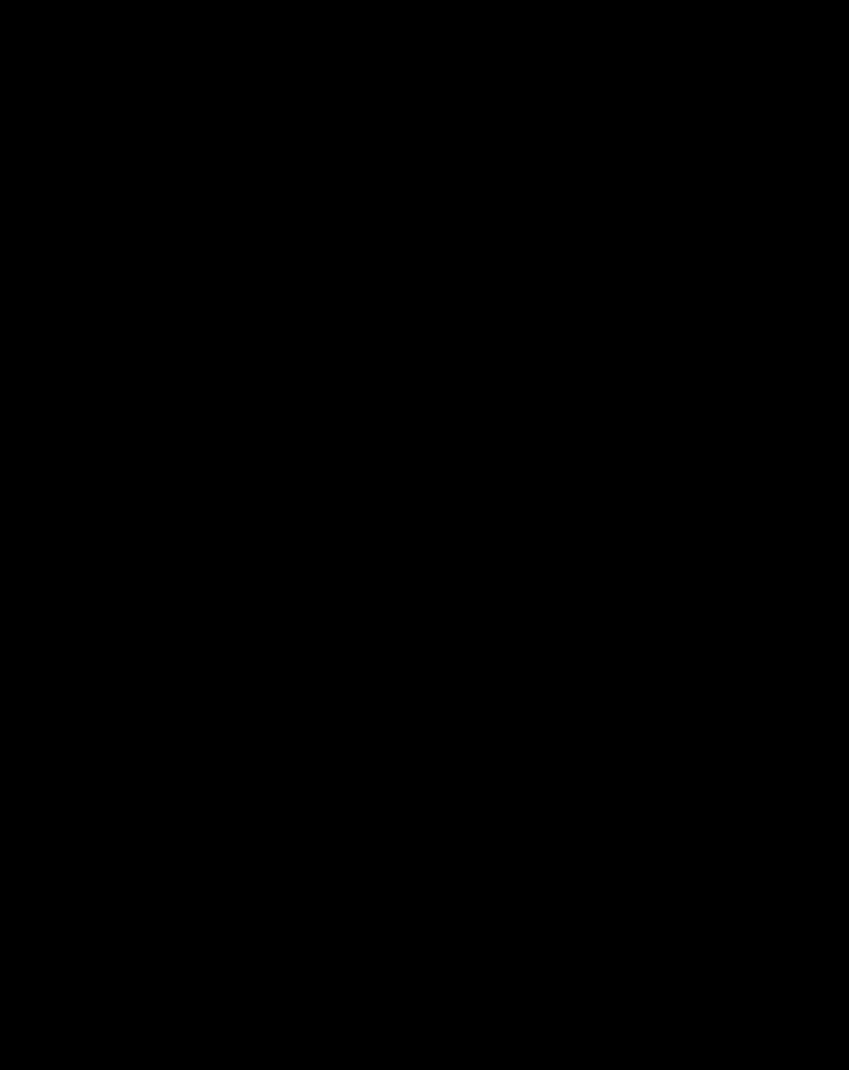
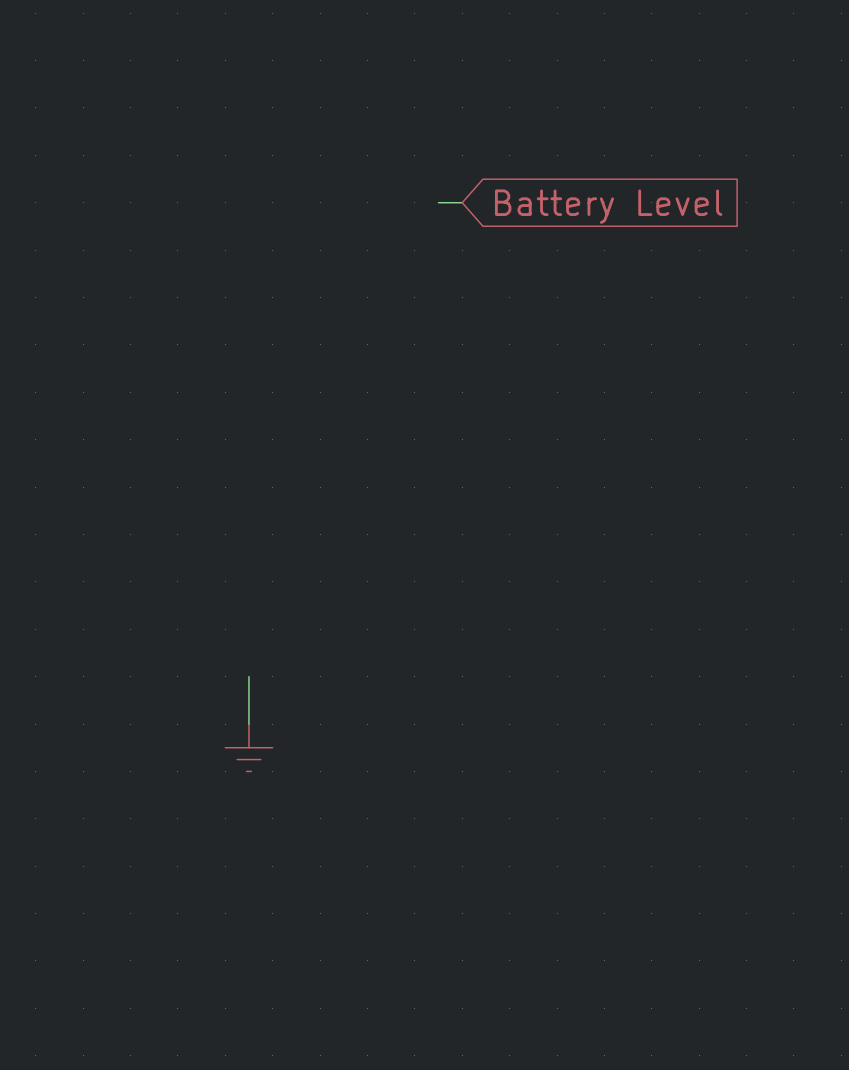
wire: none -> (438, 202) (462, 202)
global label: none -> Battery Level (608, 206)
wire: none -> (248, 676) (248, 724)
power symbol: none -> (248, 747)

